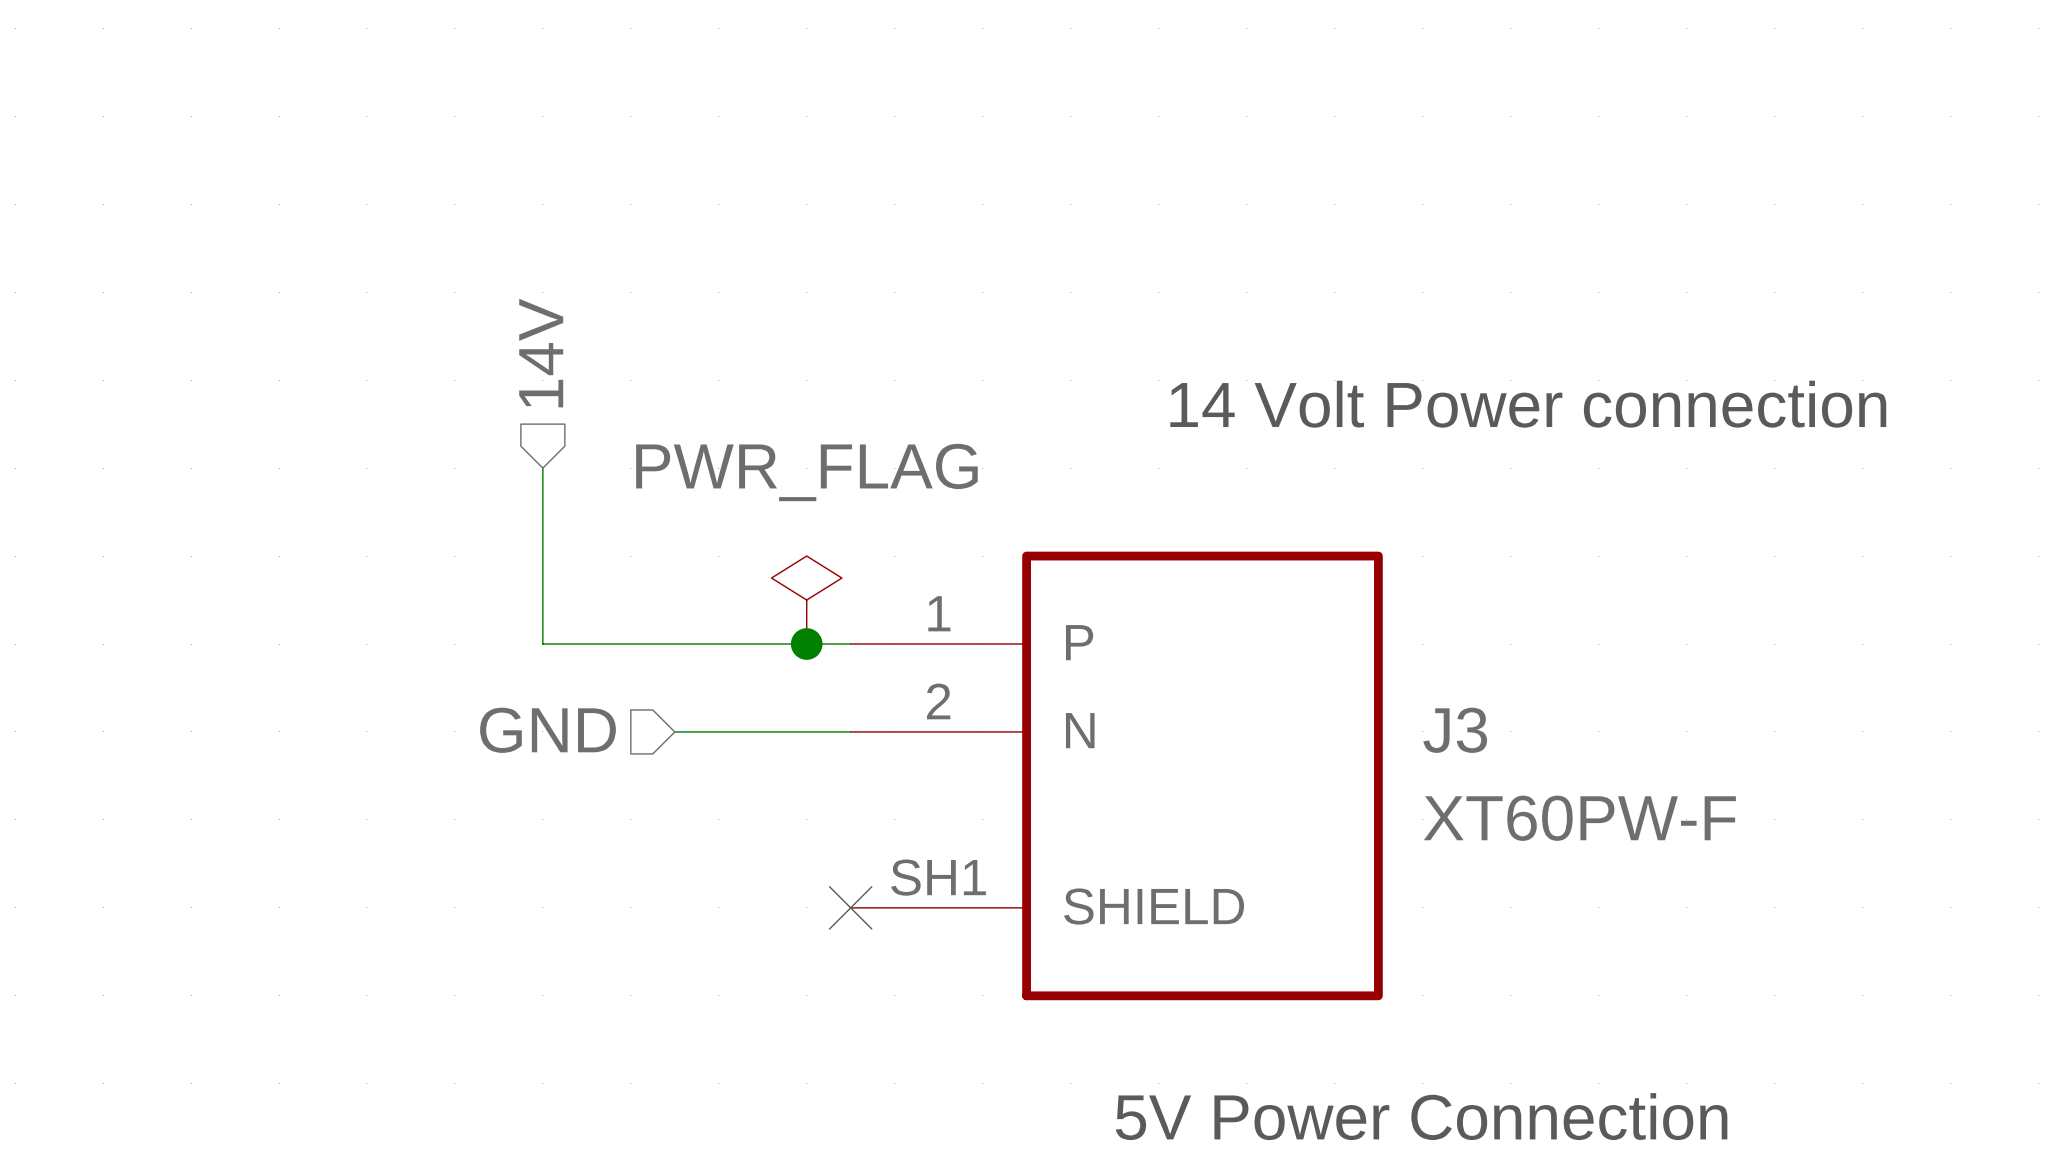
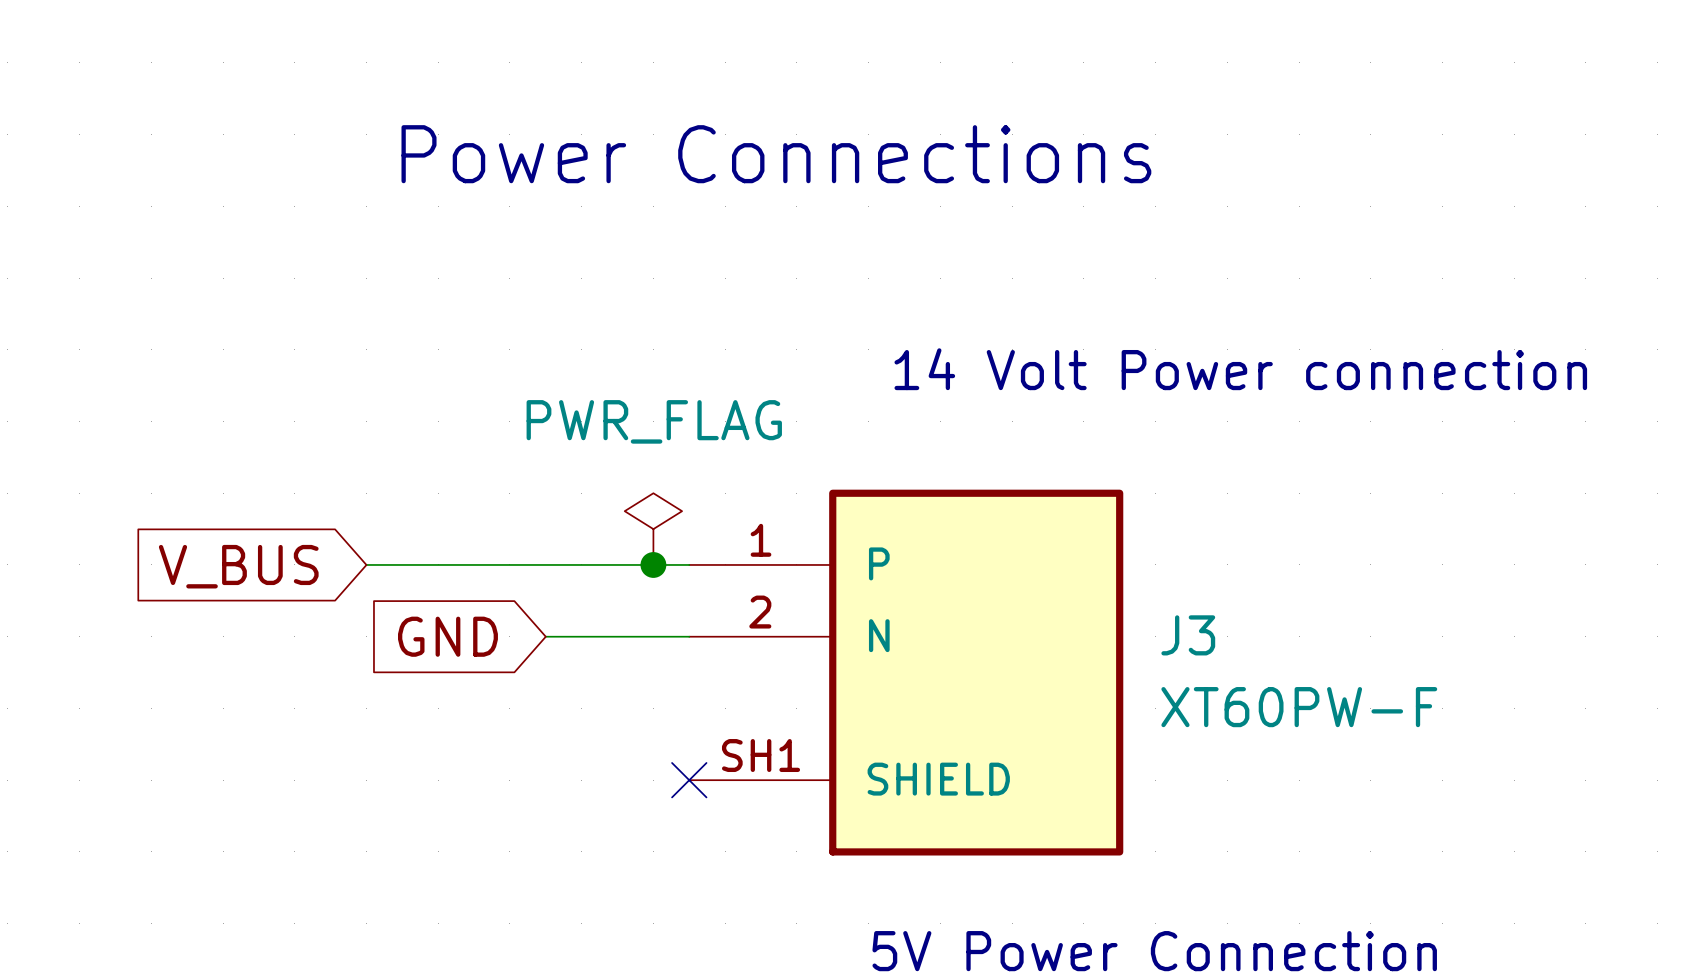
text: none -> Power Connections (776, 154)
hierarchical label: 14V (541, 353) -> none
wire: (542, 468) (542, 644) -> (366, 564) (438, 564)
global label: none -> V_BUS (238, 566)
hierarchical label: GND (548, 730) -> none
global label: none -> GND (447, 636)

